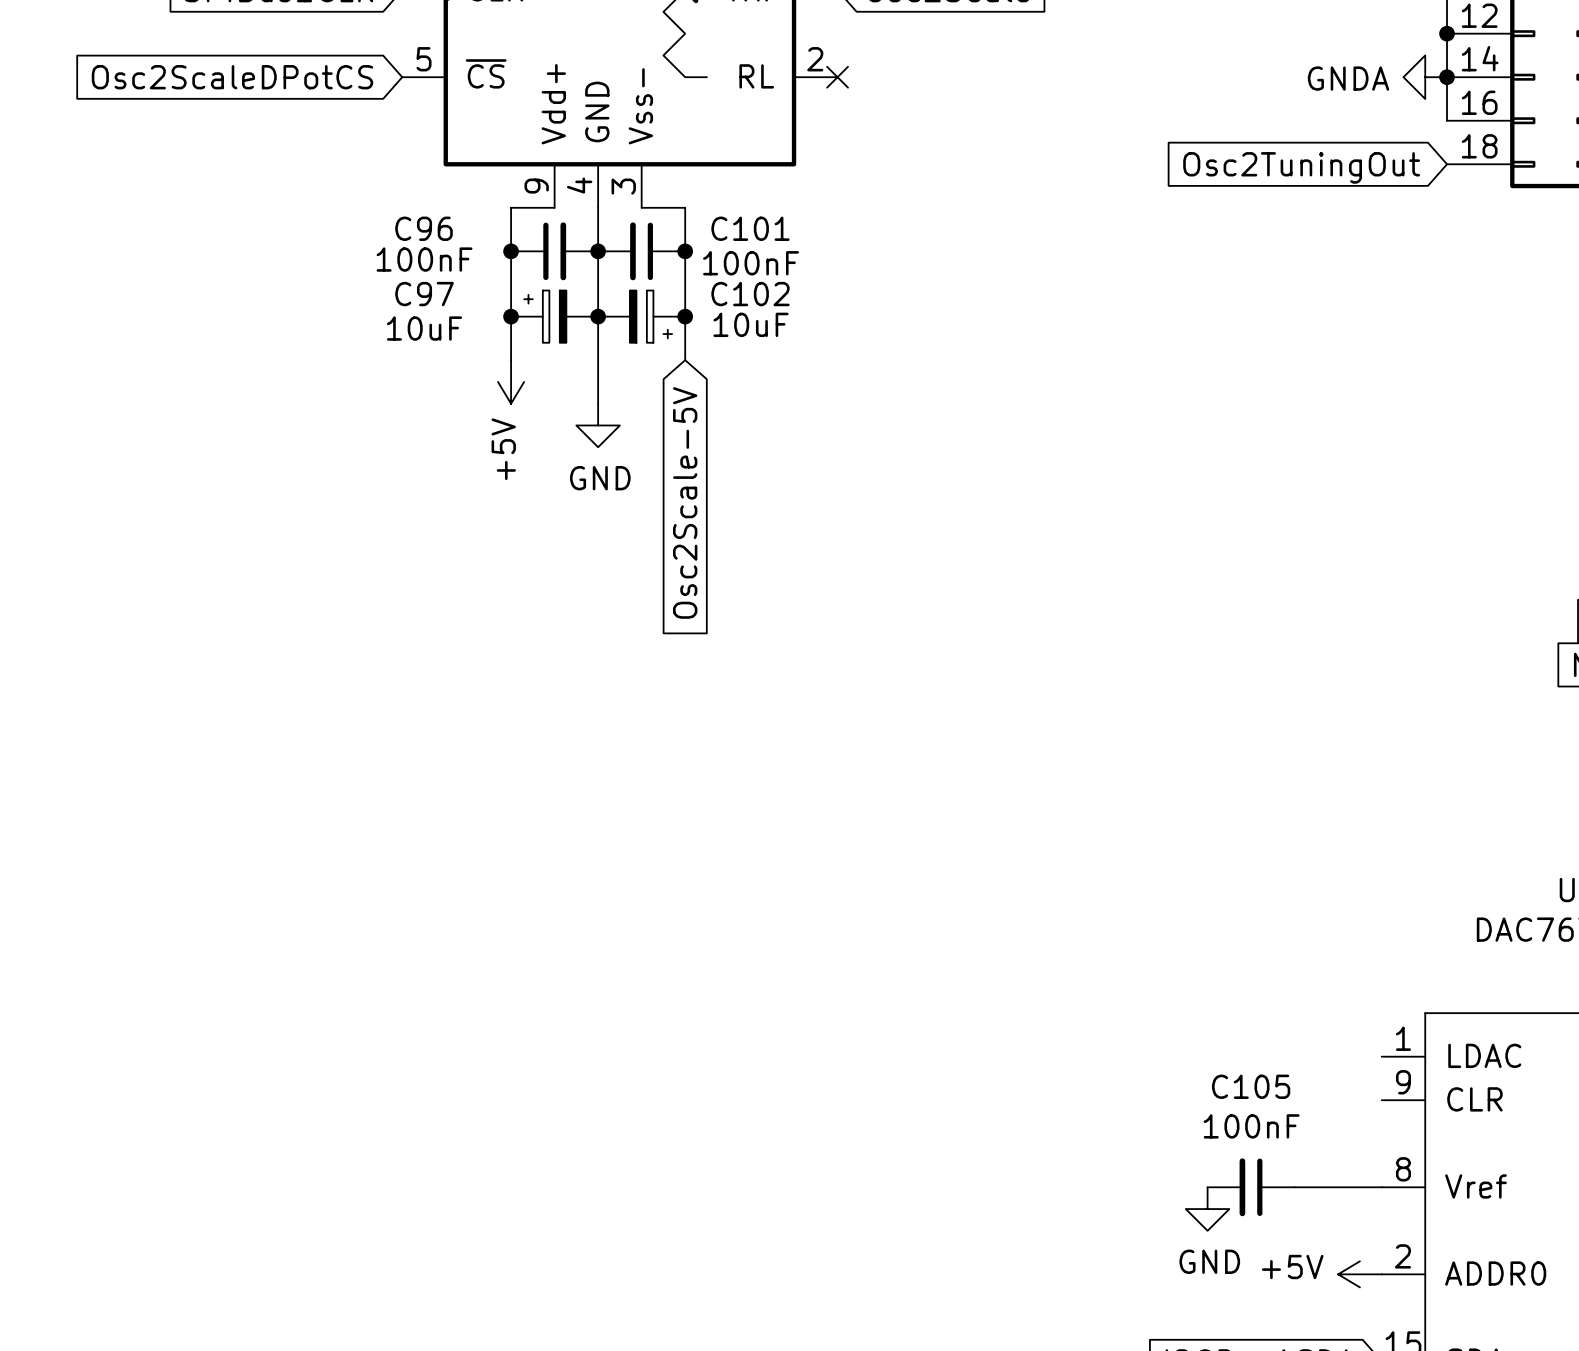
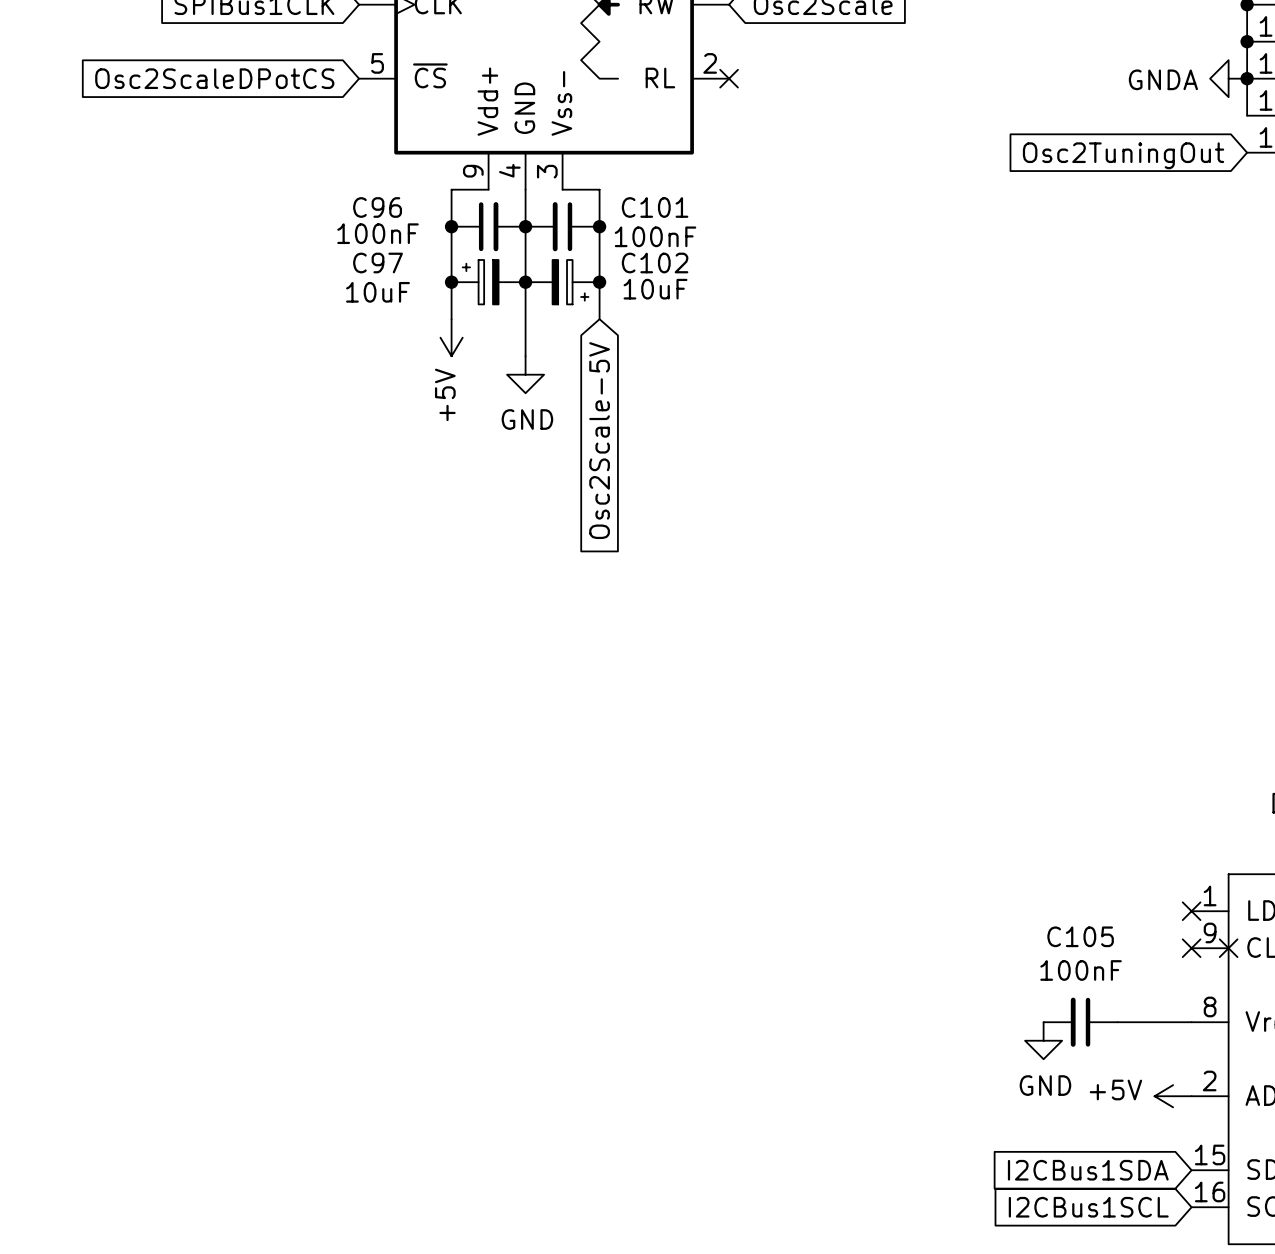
no-connect mark: none -> (1191, 911)
no-connect mark: none -> (1191, 948)
no-connect mark: none -> (1228, 948)

